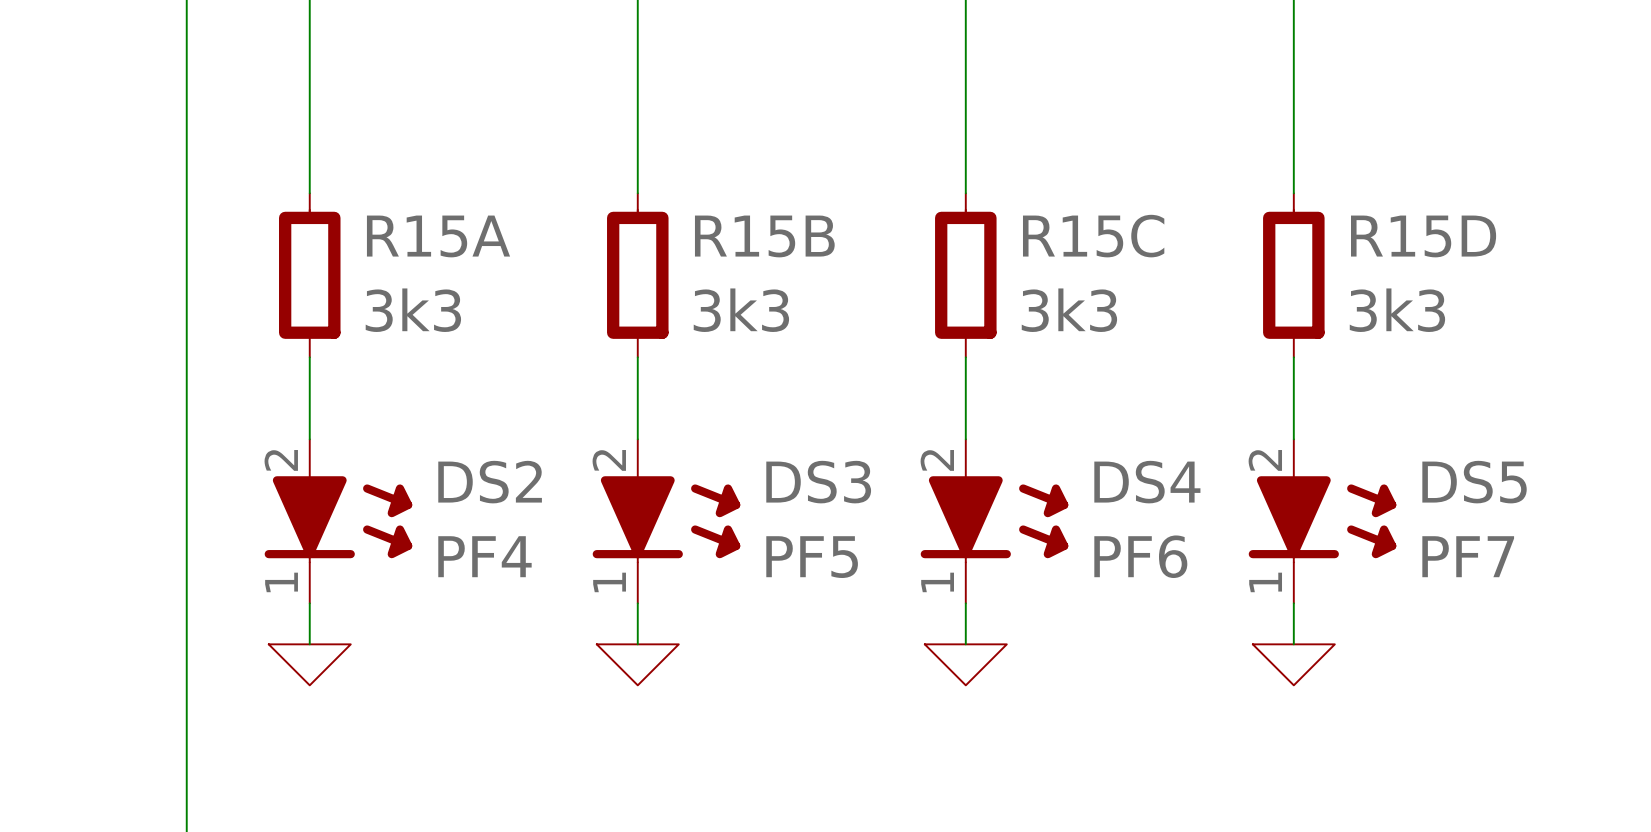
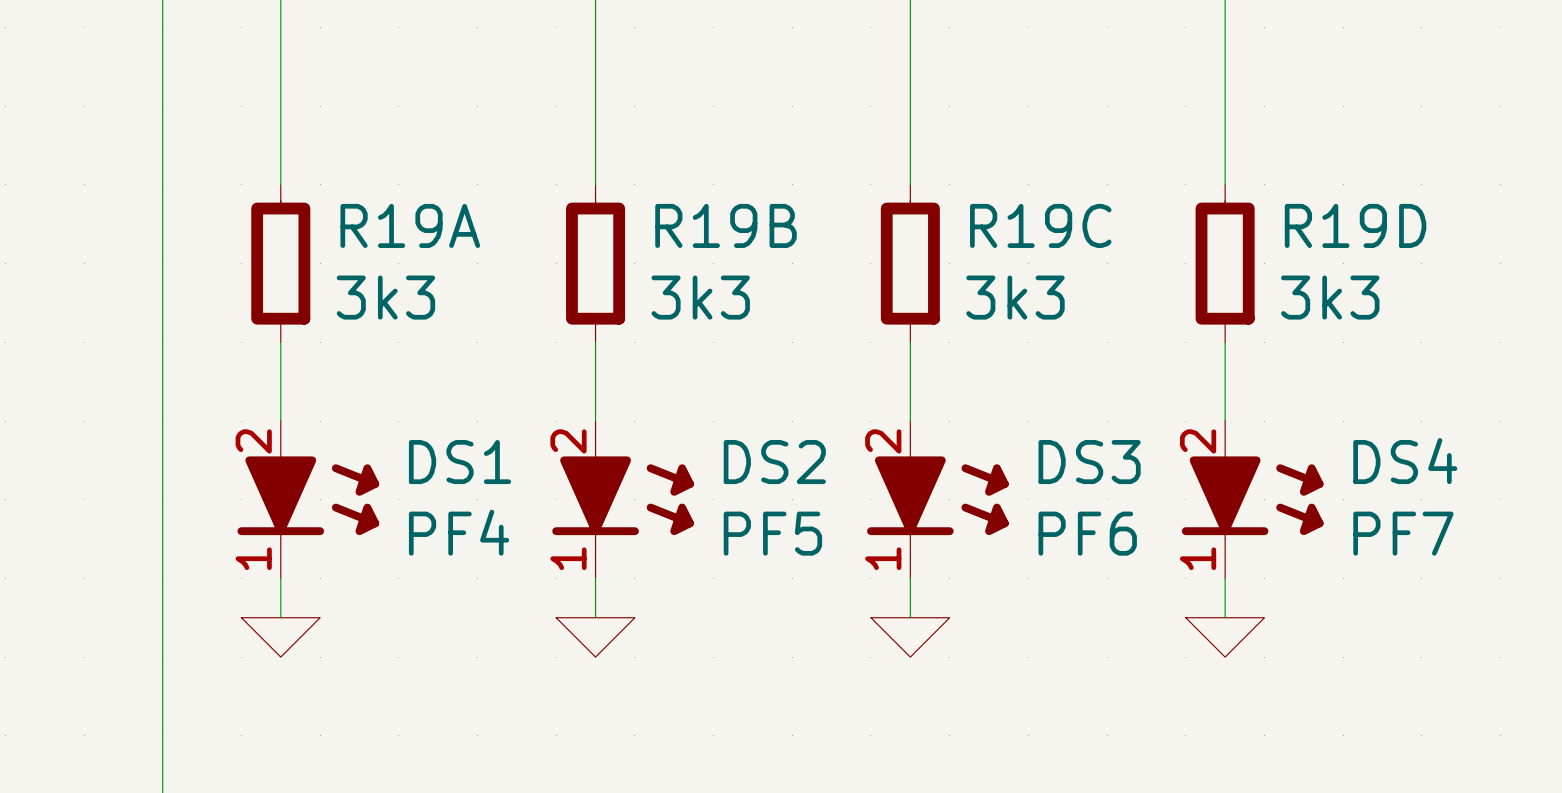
R15A name: R15A (438, 236) -> R19A (410, 225)
R15B name: R15B (764, 236) -> R19B (726, 225)
R15C name: R15C (1093, 236) -> R19C (1040, 225)
R15D name: R15D (1423, 236) -> R19D (1355, 225)
DS2 name: DS2 (490, 482) -> DS1 (460, 462)
DS3 name: DS3 (818, 482) -> DS2 (774, 462)
DS4 name: DS4 (1147, 482) -> DS3 (1089, 462)
DS5 name: DS5 (1474, 482) -> DS4 (1405, 461)

